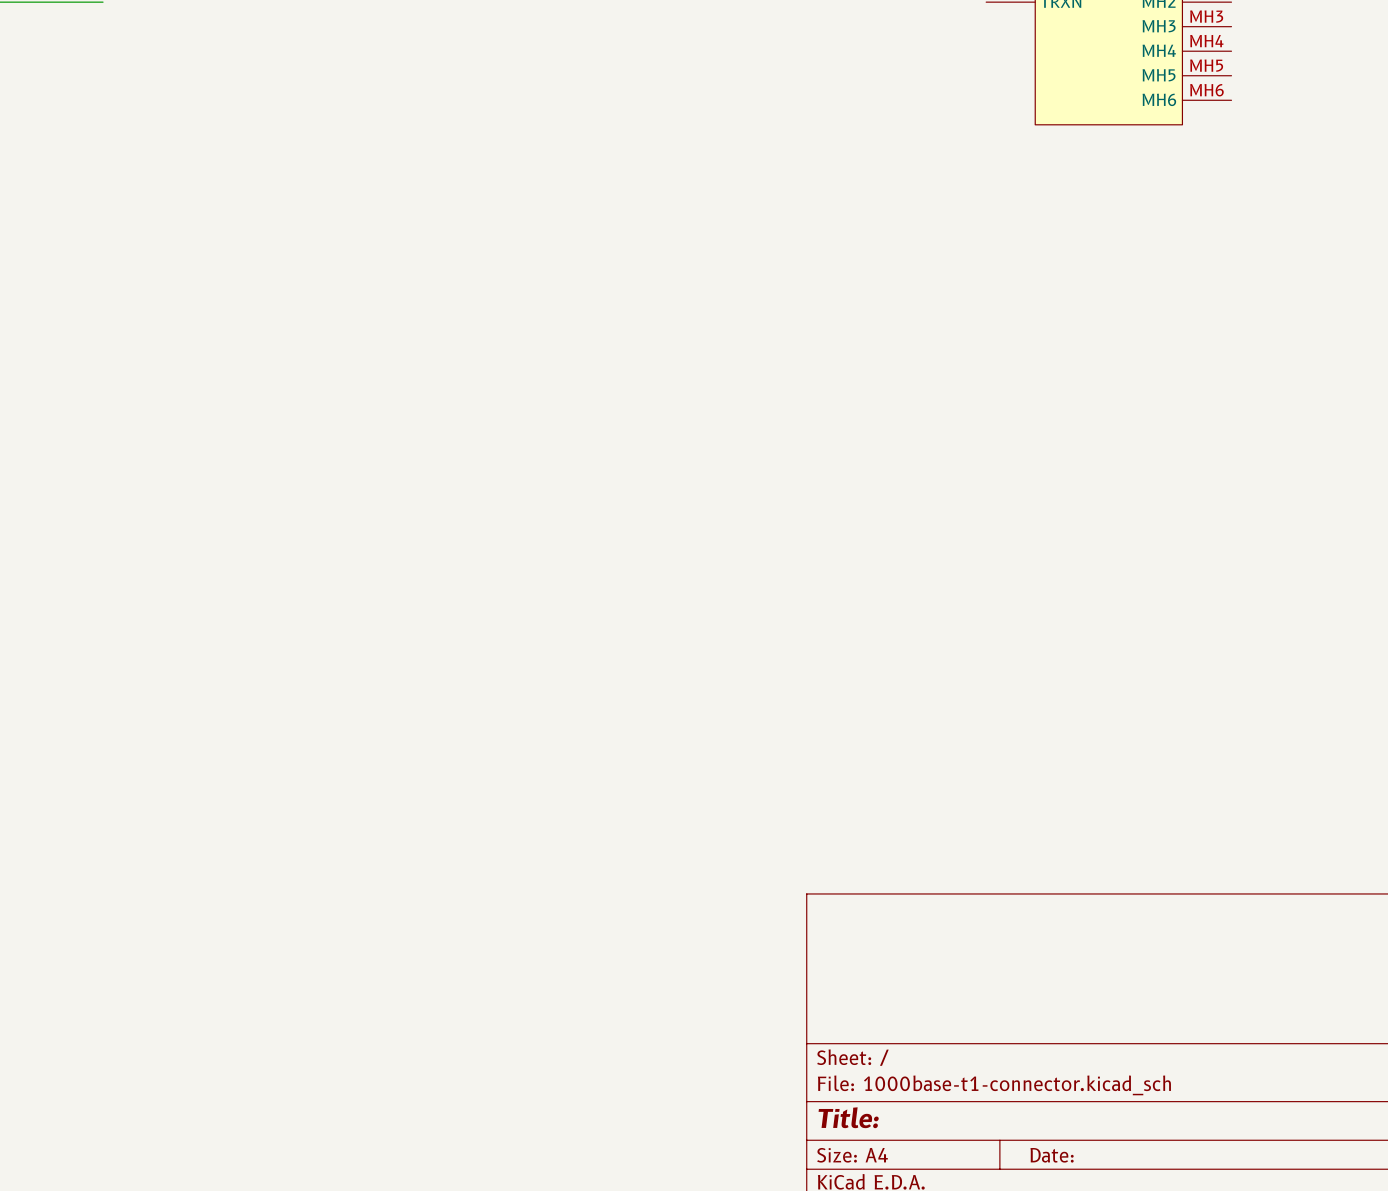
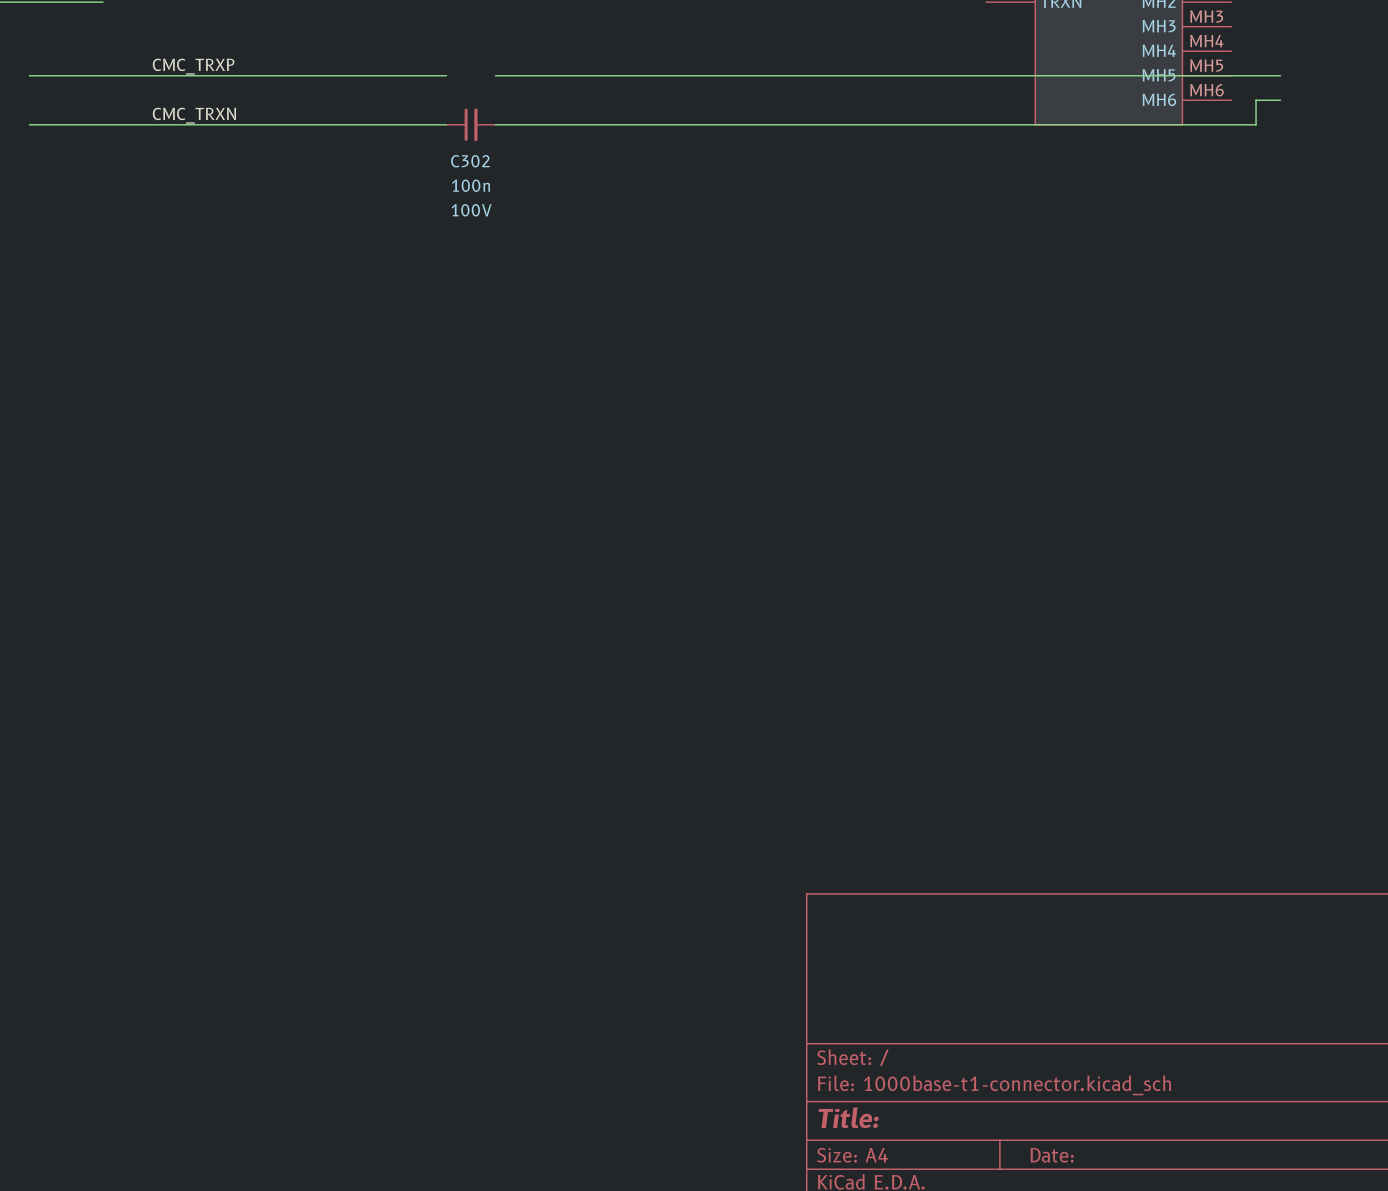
label: none -> CMC_TRXP (193, 66)
wire: none -> (29, 75) (446, 75)
wire: none -> (495, 75) (1280, 75)
wire: none -> (1280, 100) (1256, 100) (1256, 124) (495, 124)
label: none -> CMC_TRXN (194, 115)
wire: none -> (29, 124) (446, 124)
C302: none -> 100n (471, 124)

